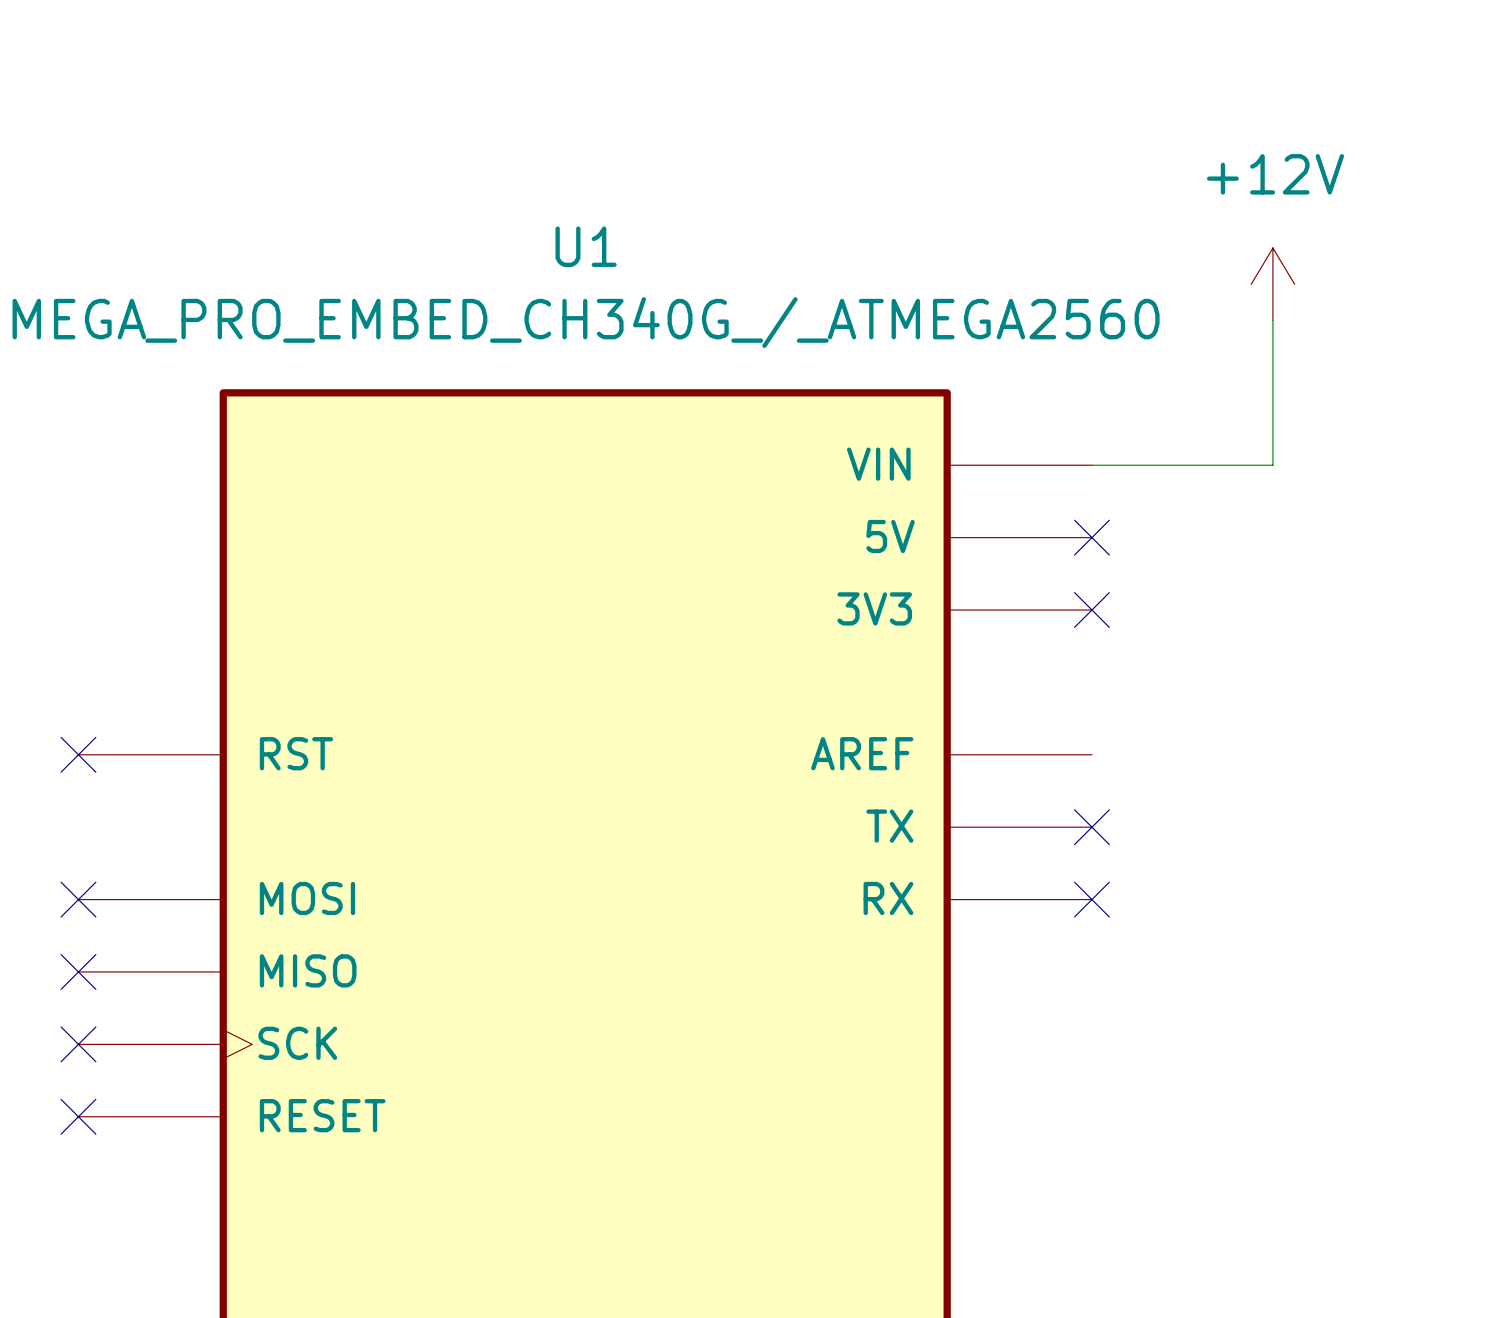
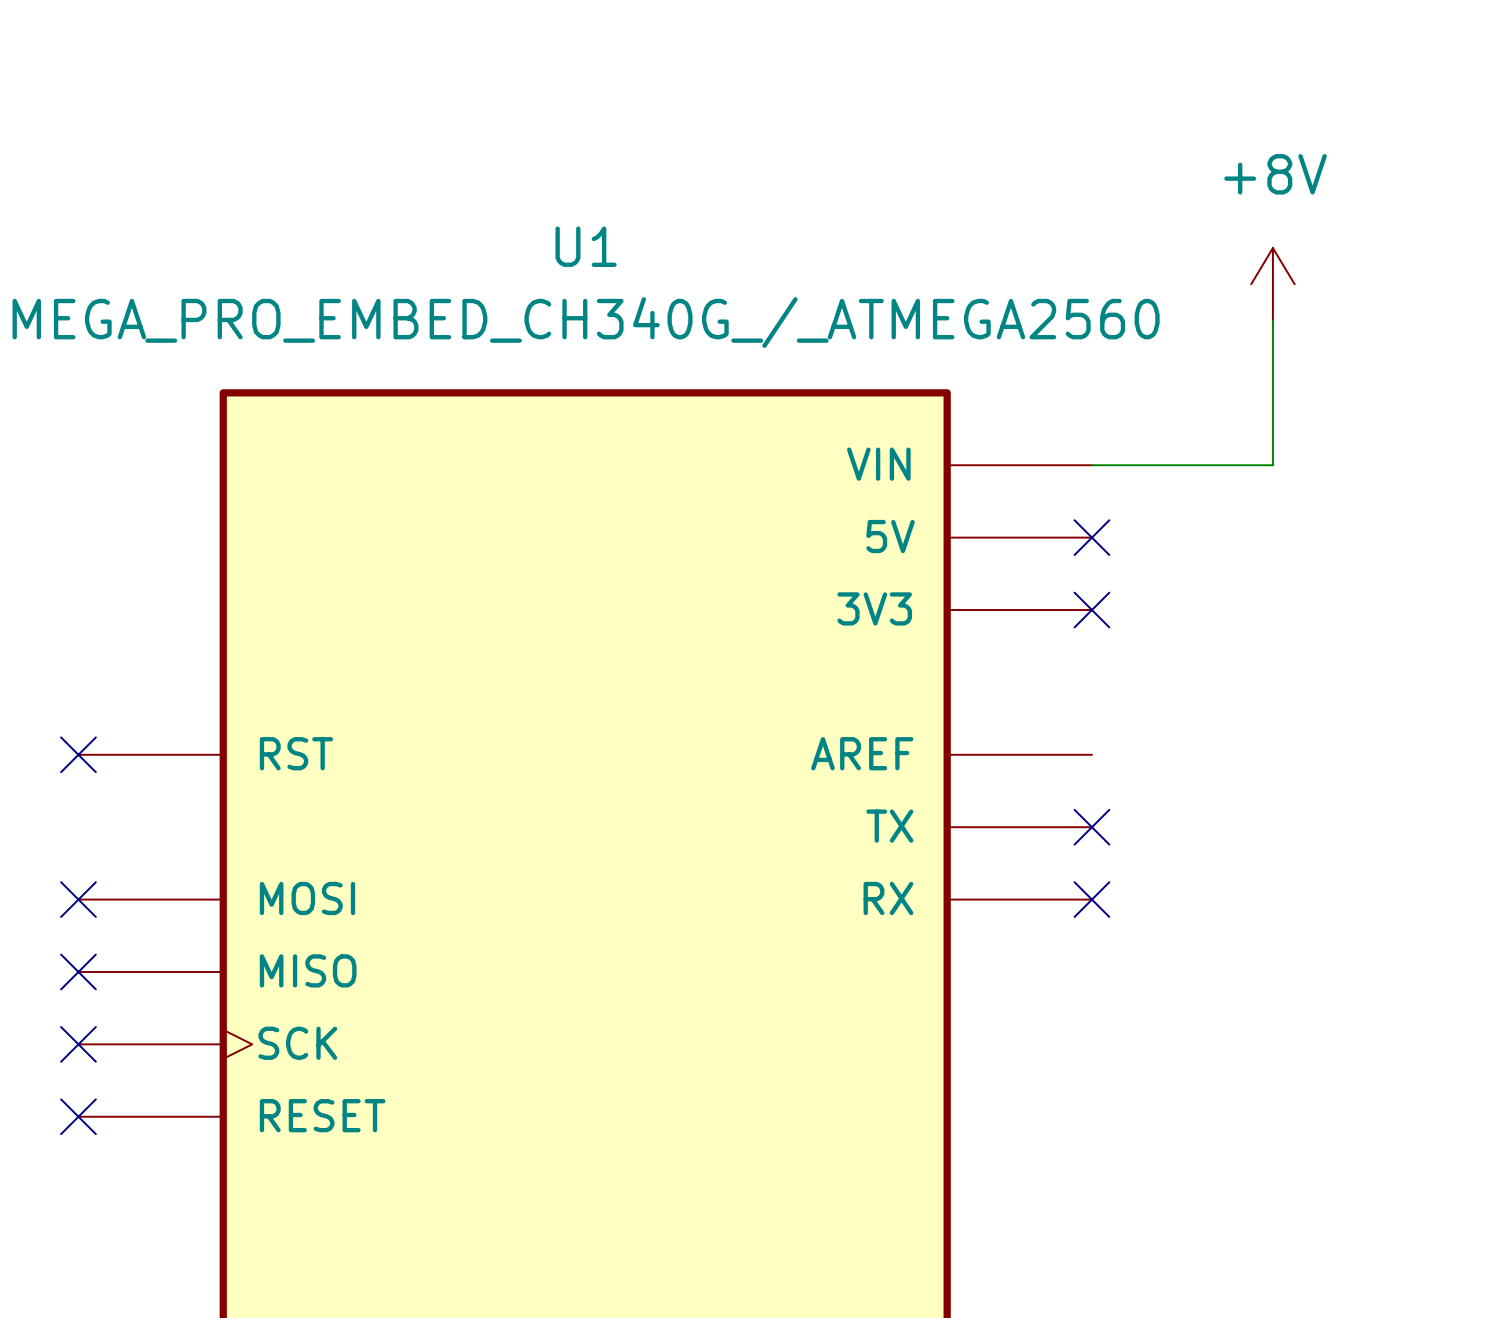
power symbol: +12V (1272, 284) -> +8V (1272, 284)

